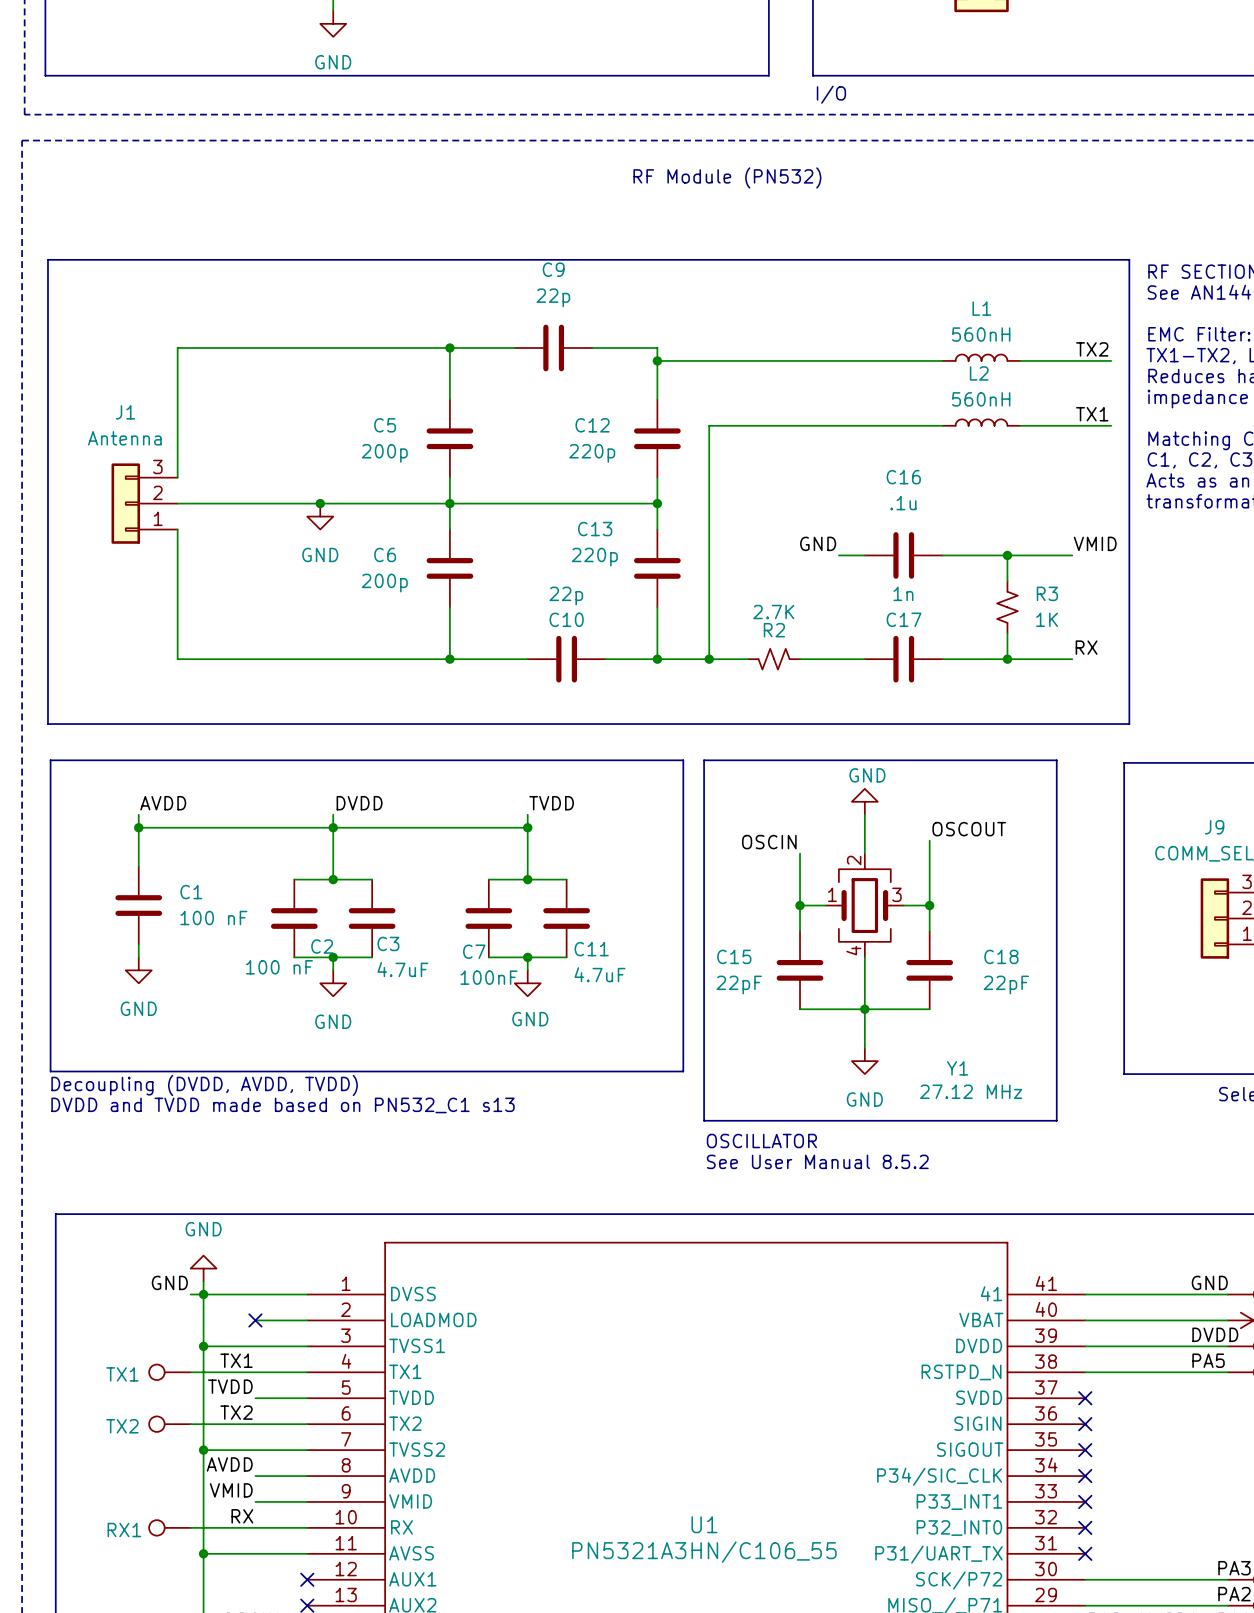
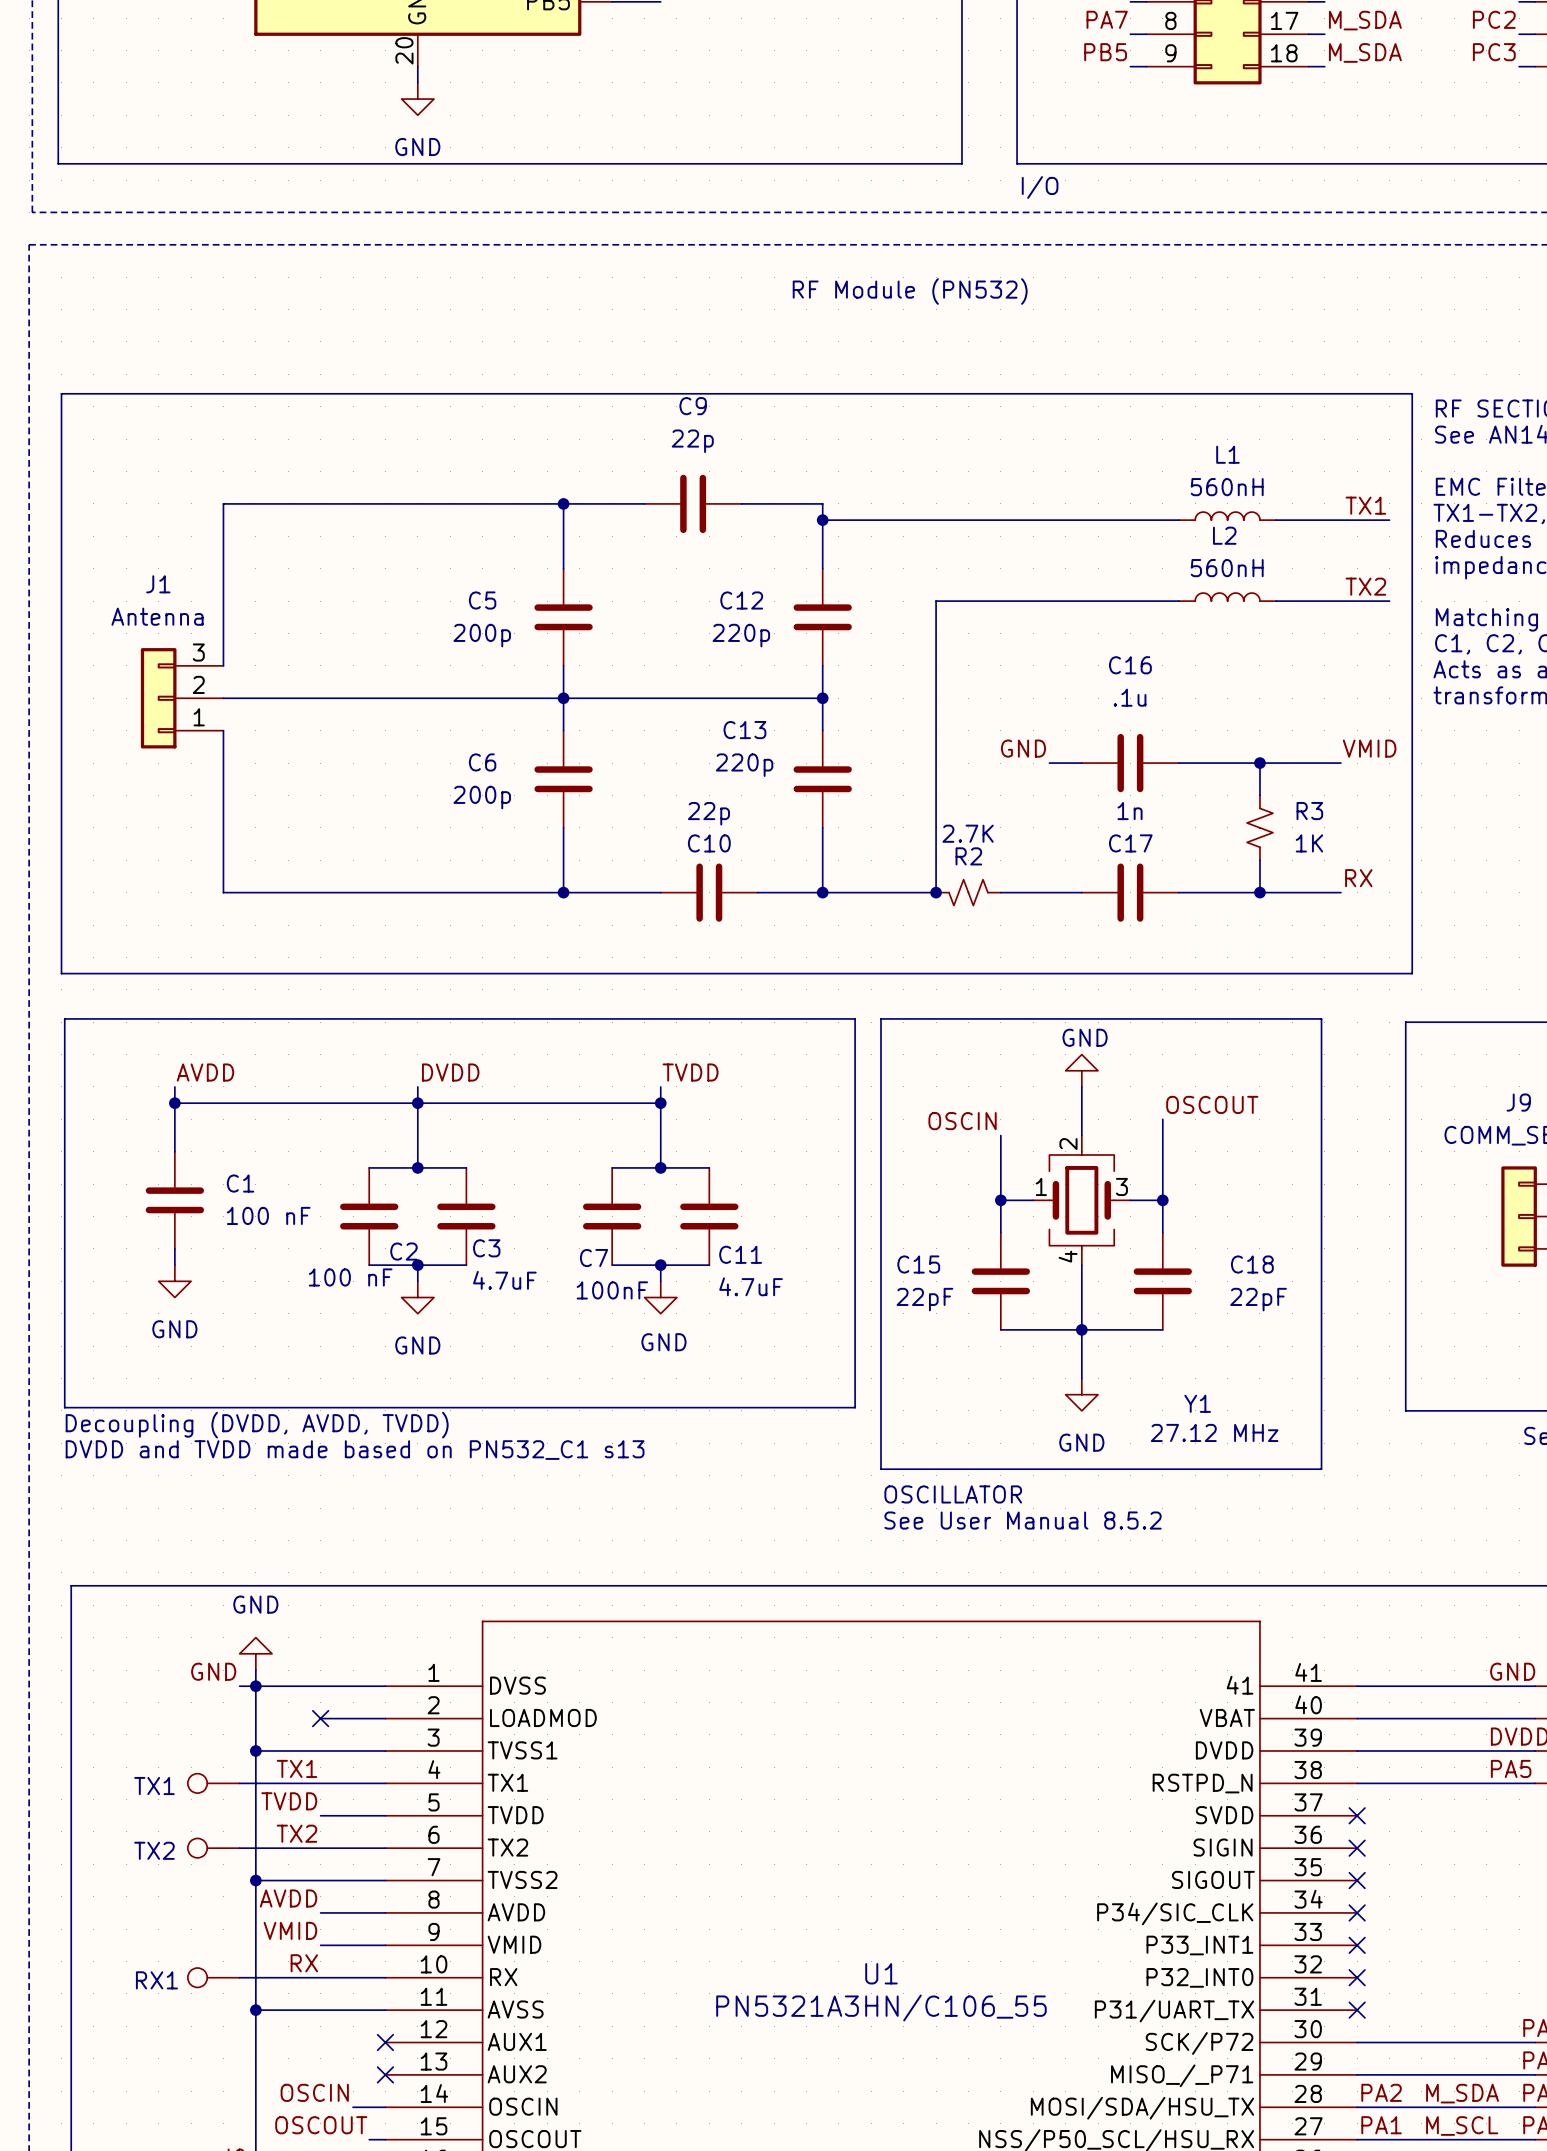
label: TX2 (1092, 349) -> TX1 (1365, 505)
label: TX1 (1092, 414) -> TX2 (1365, 586)
wire: (748, 425) (709, 425) (709, 659) -> (936, 601) (936, 892)
junction: (320, 503) -> none
power symbol: GND (320, 516) -> none
junction position: (709, 659) -> (936, 892)

